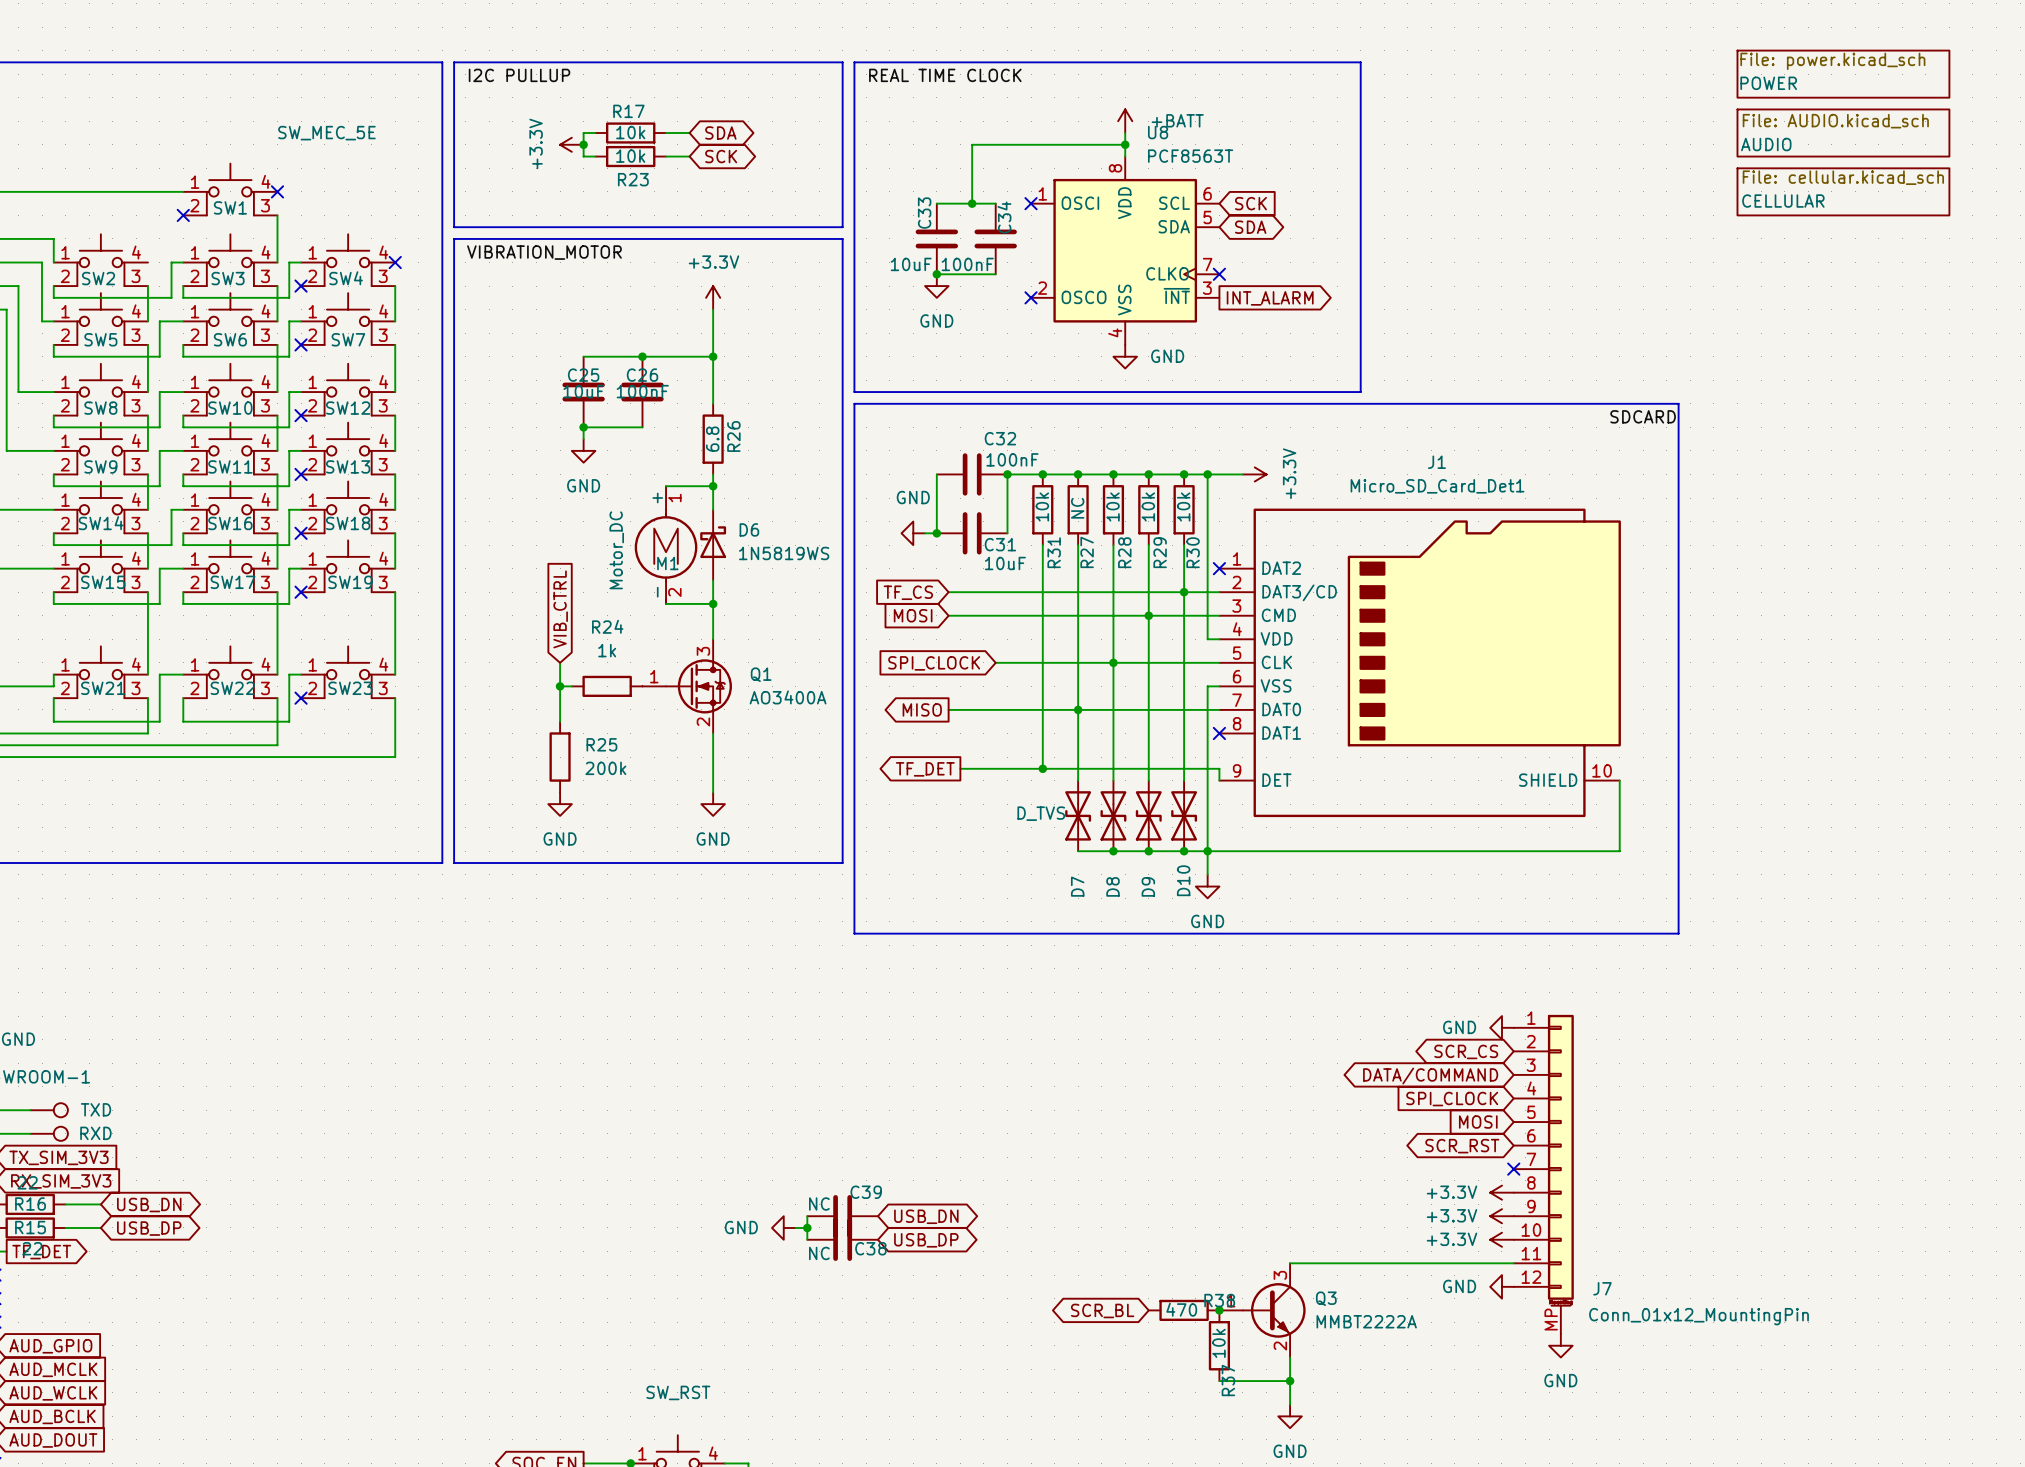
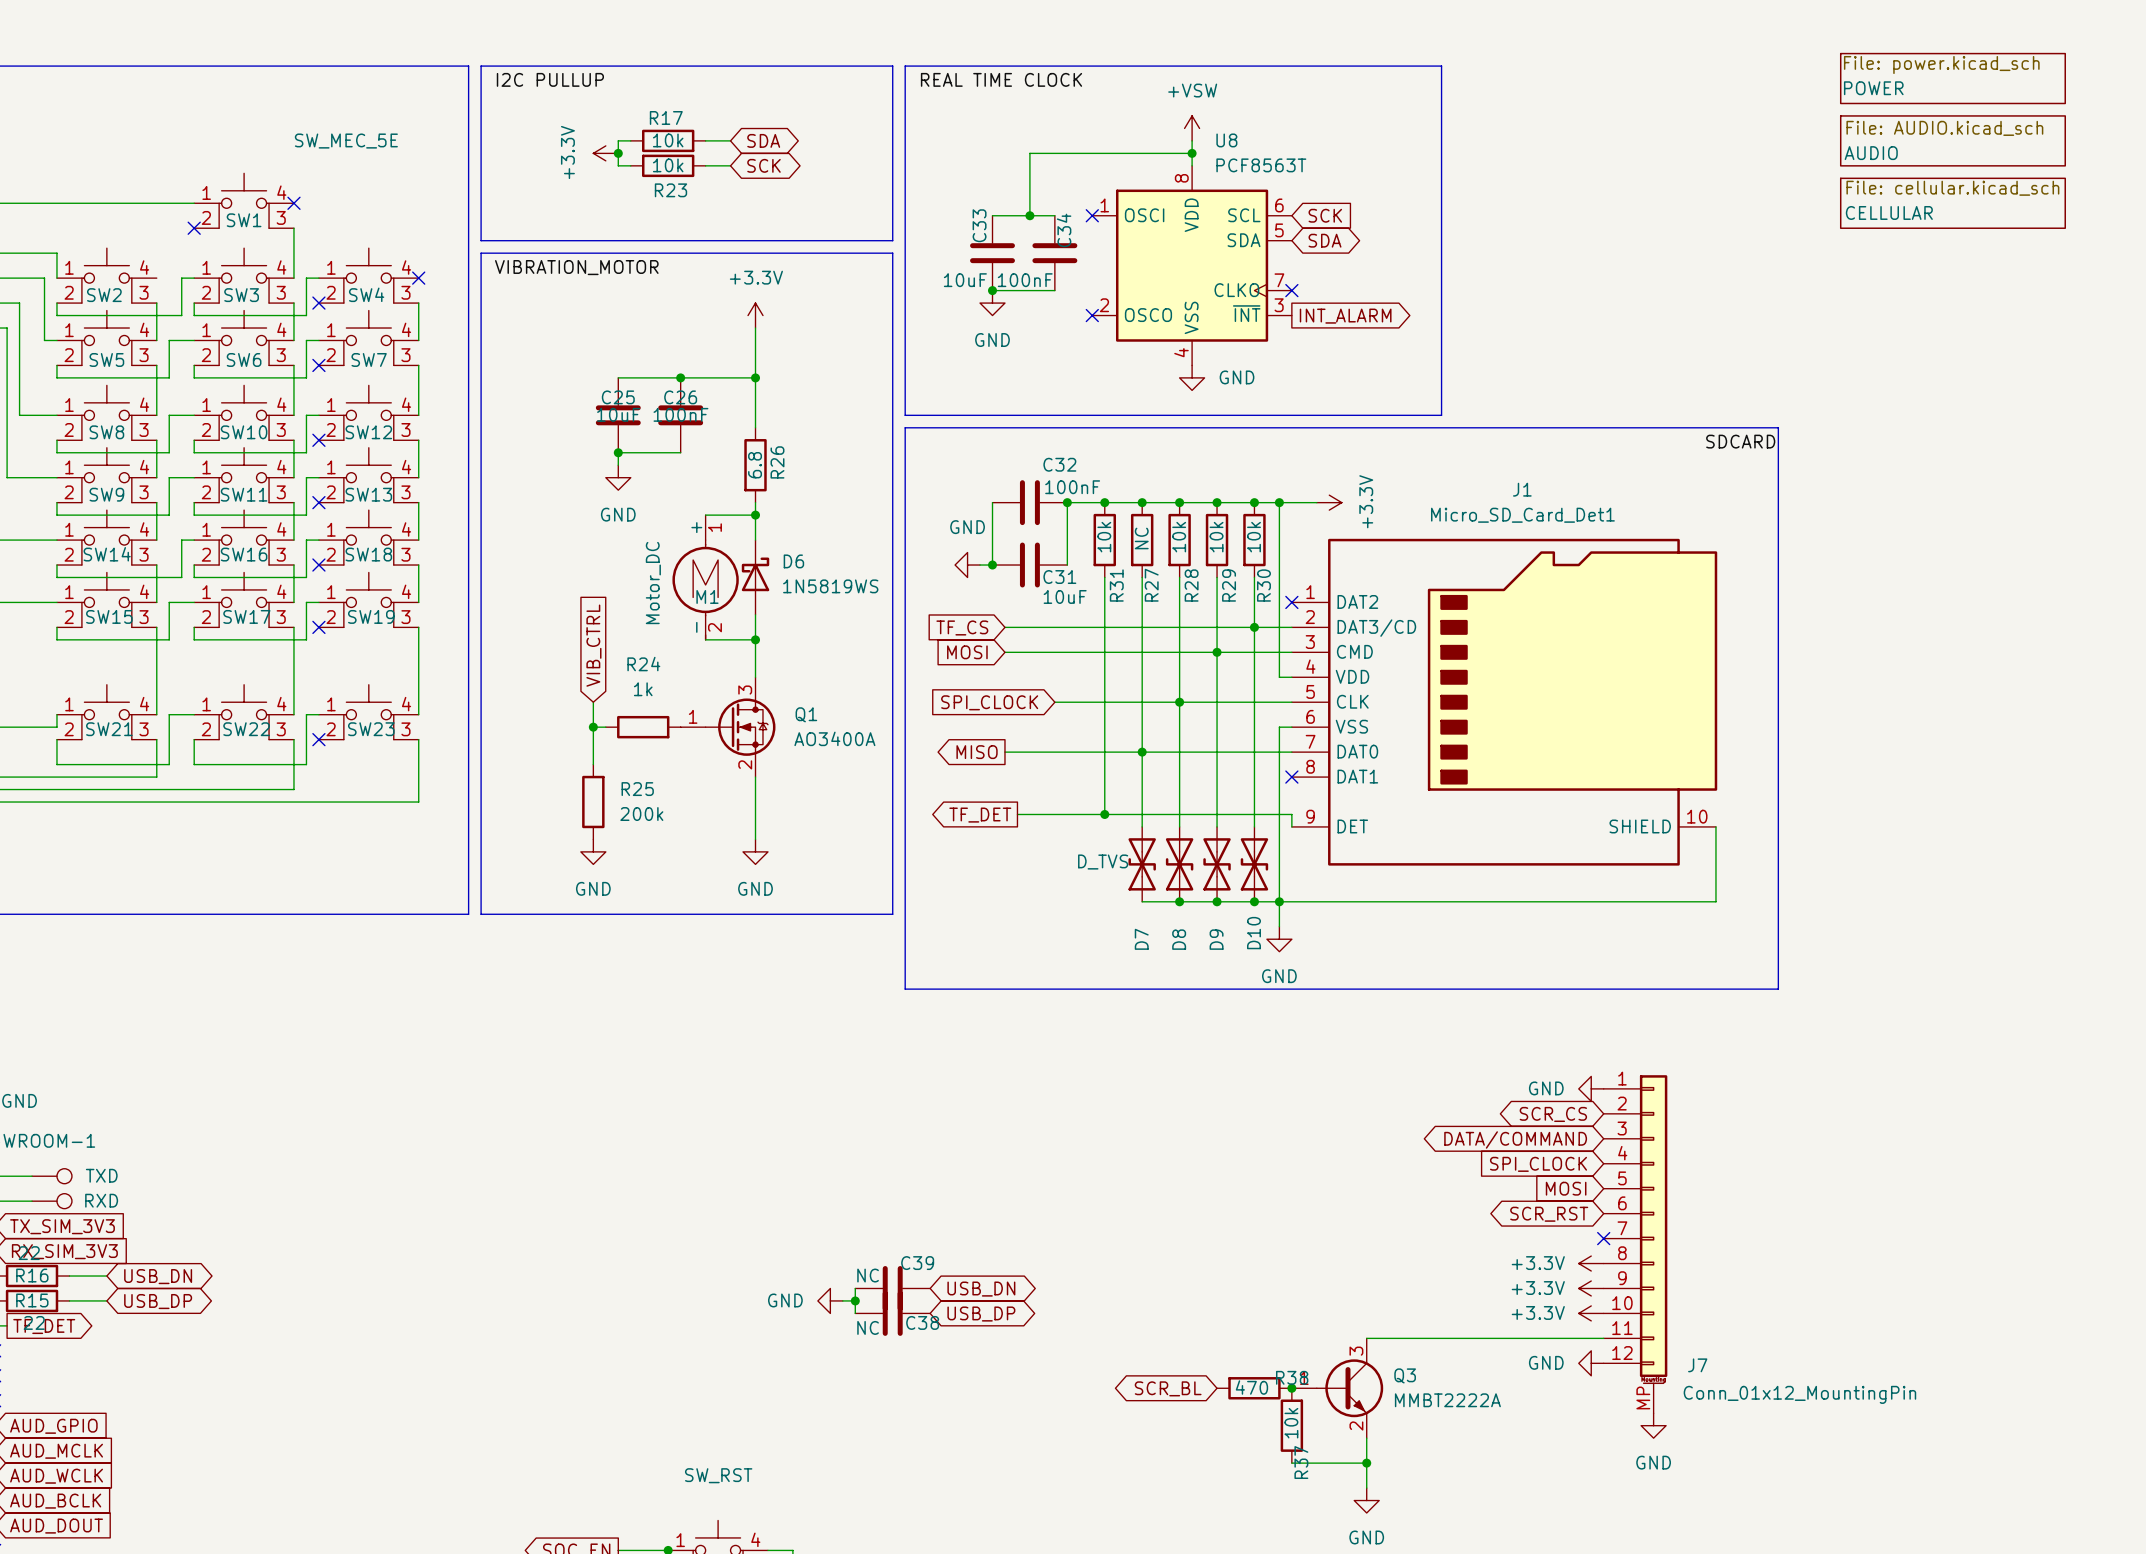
power symbol: +BATT (1125, 121) -> +VSW (1192, 128)

